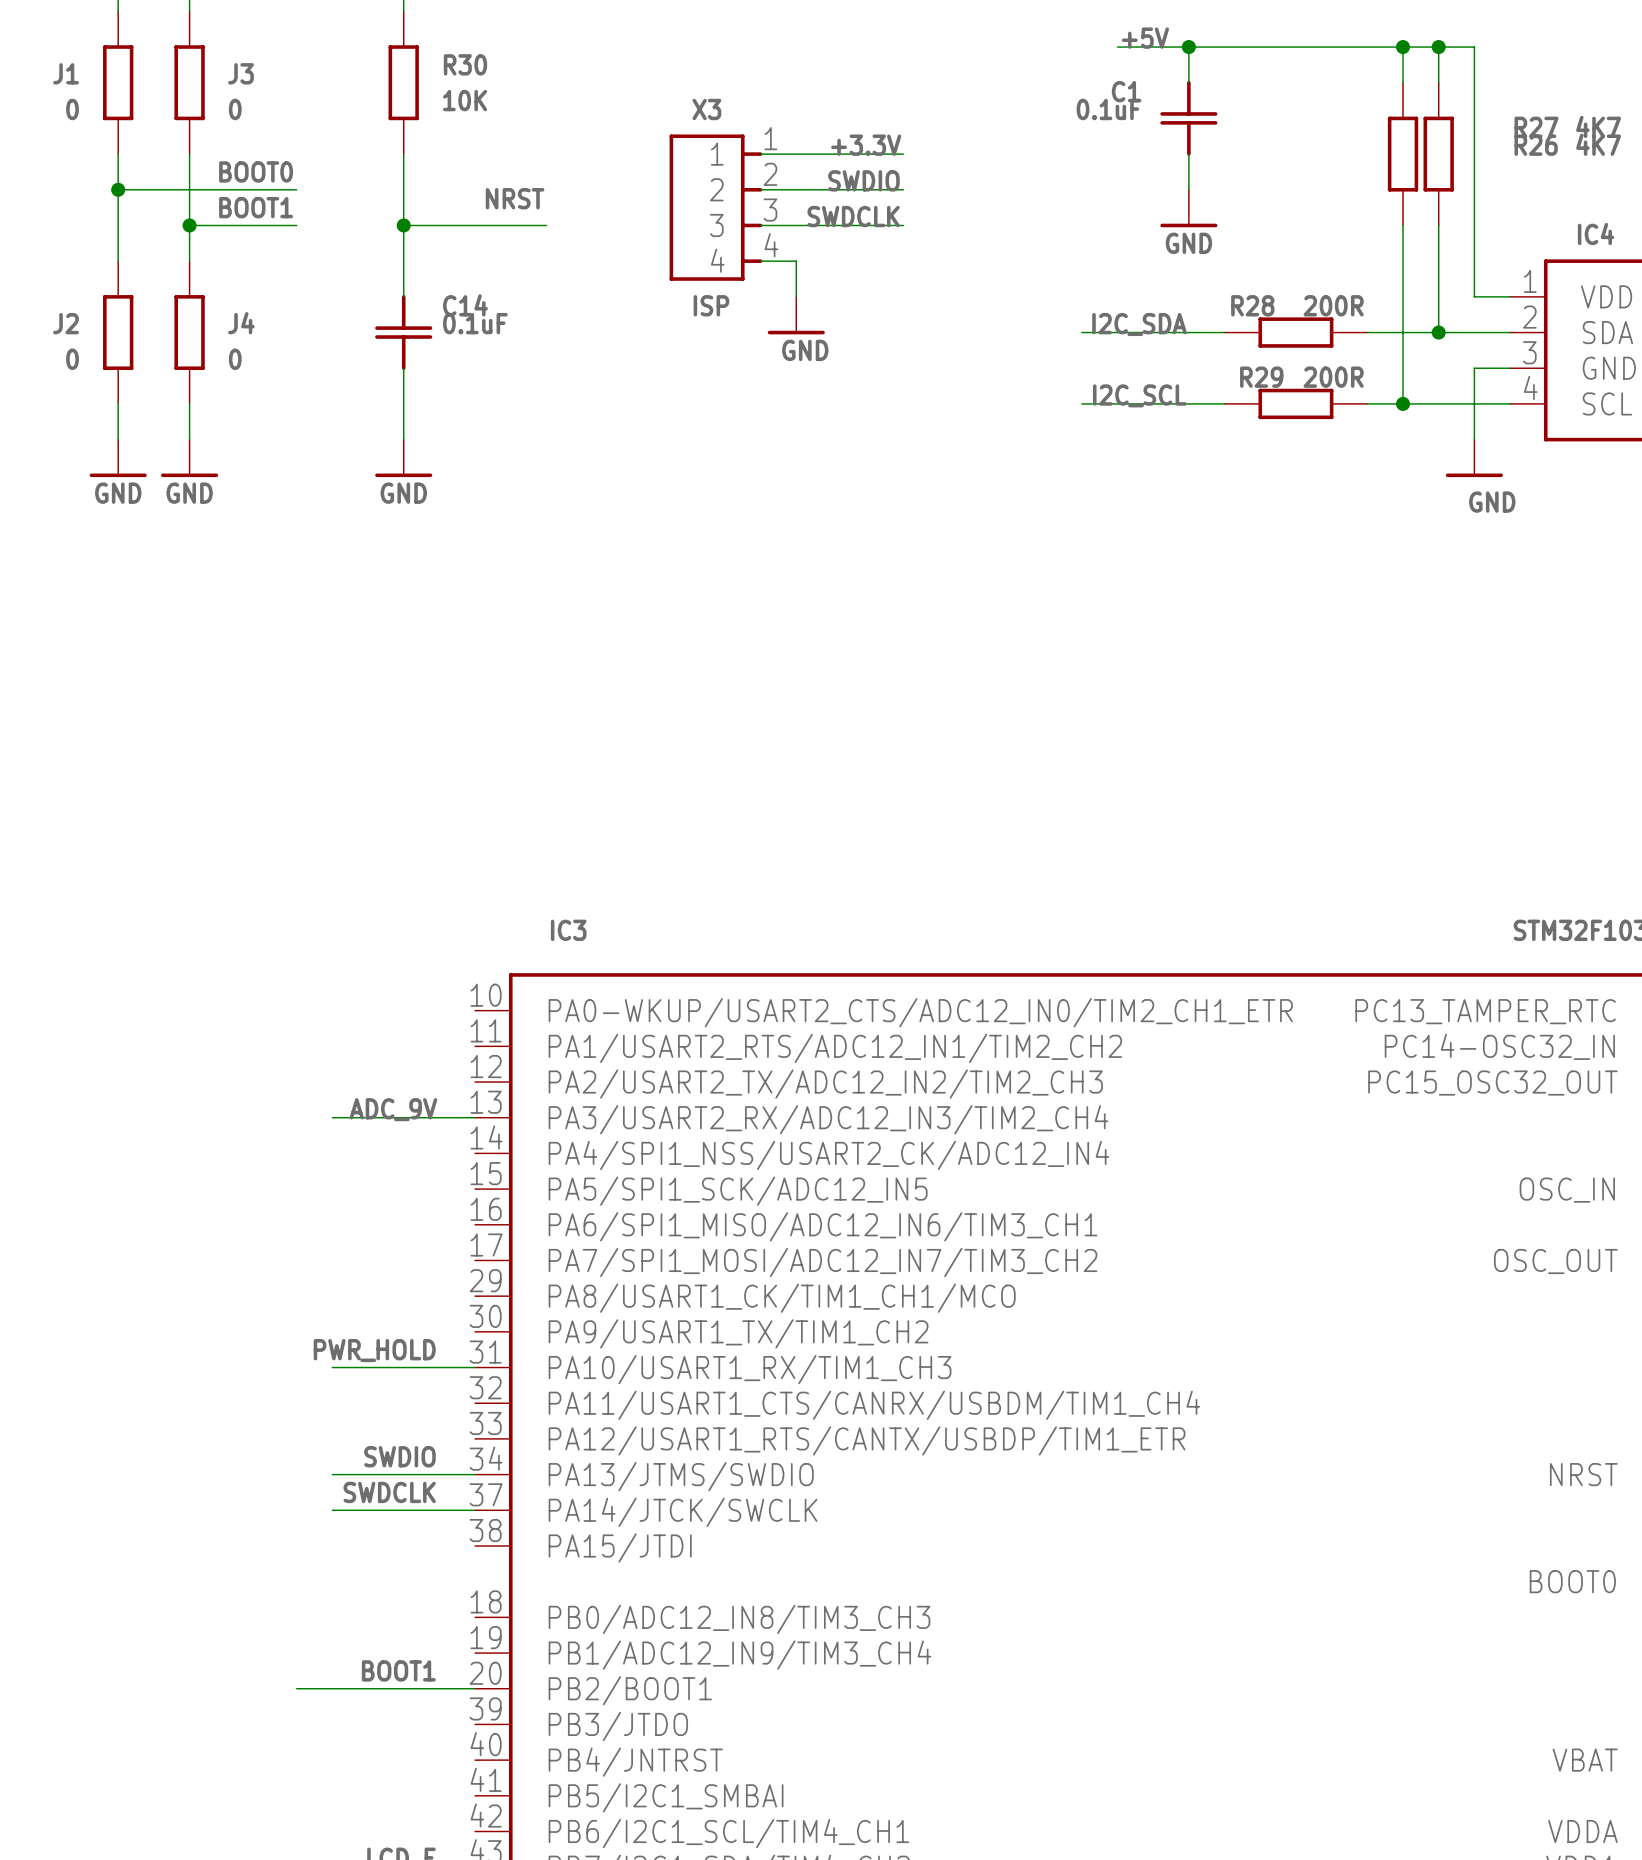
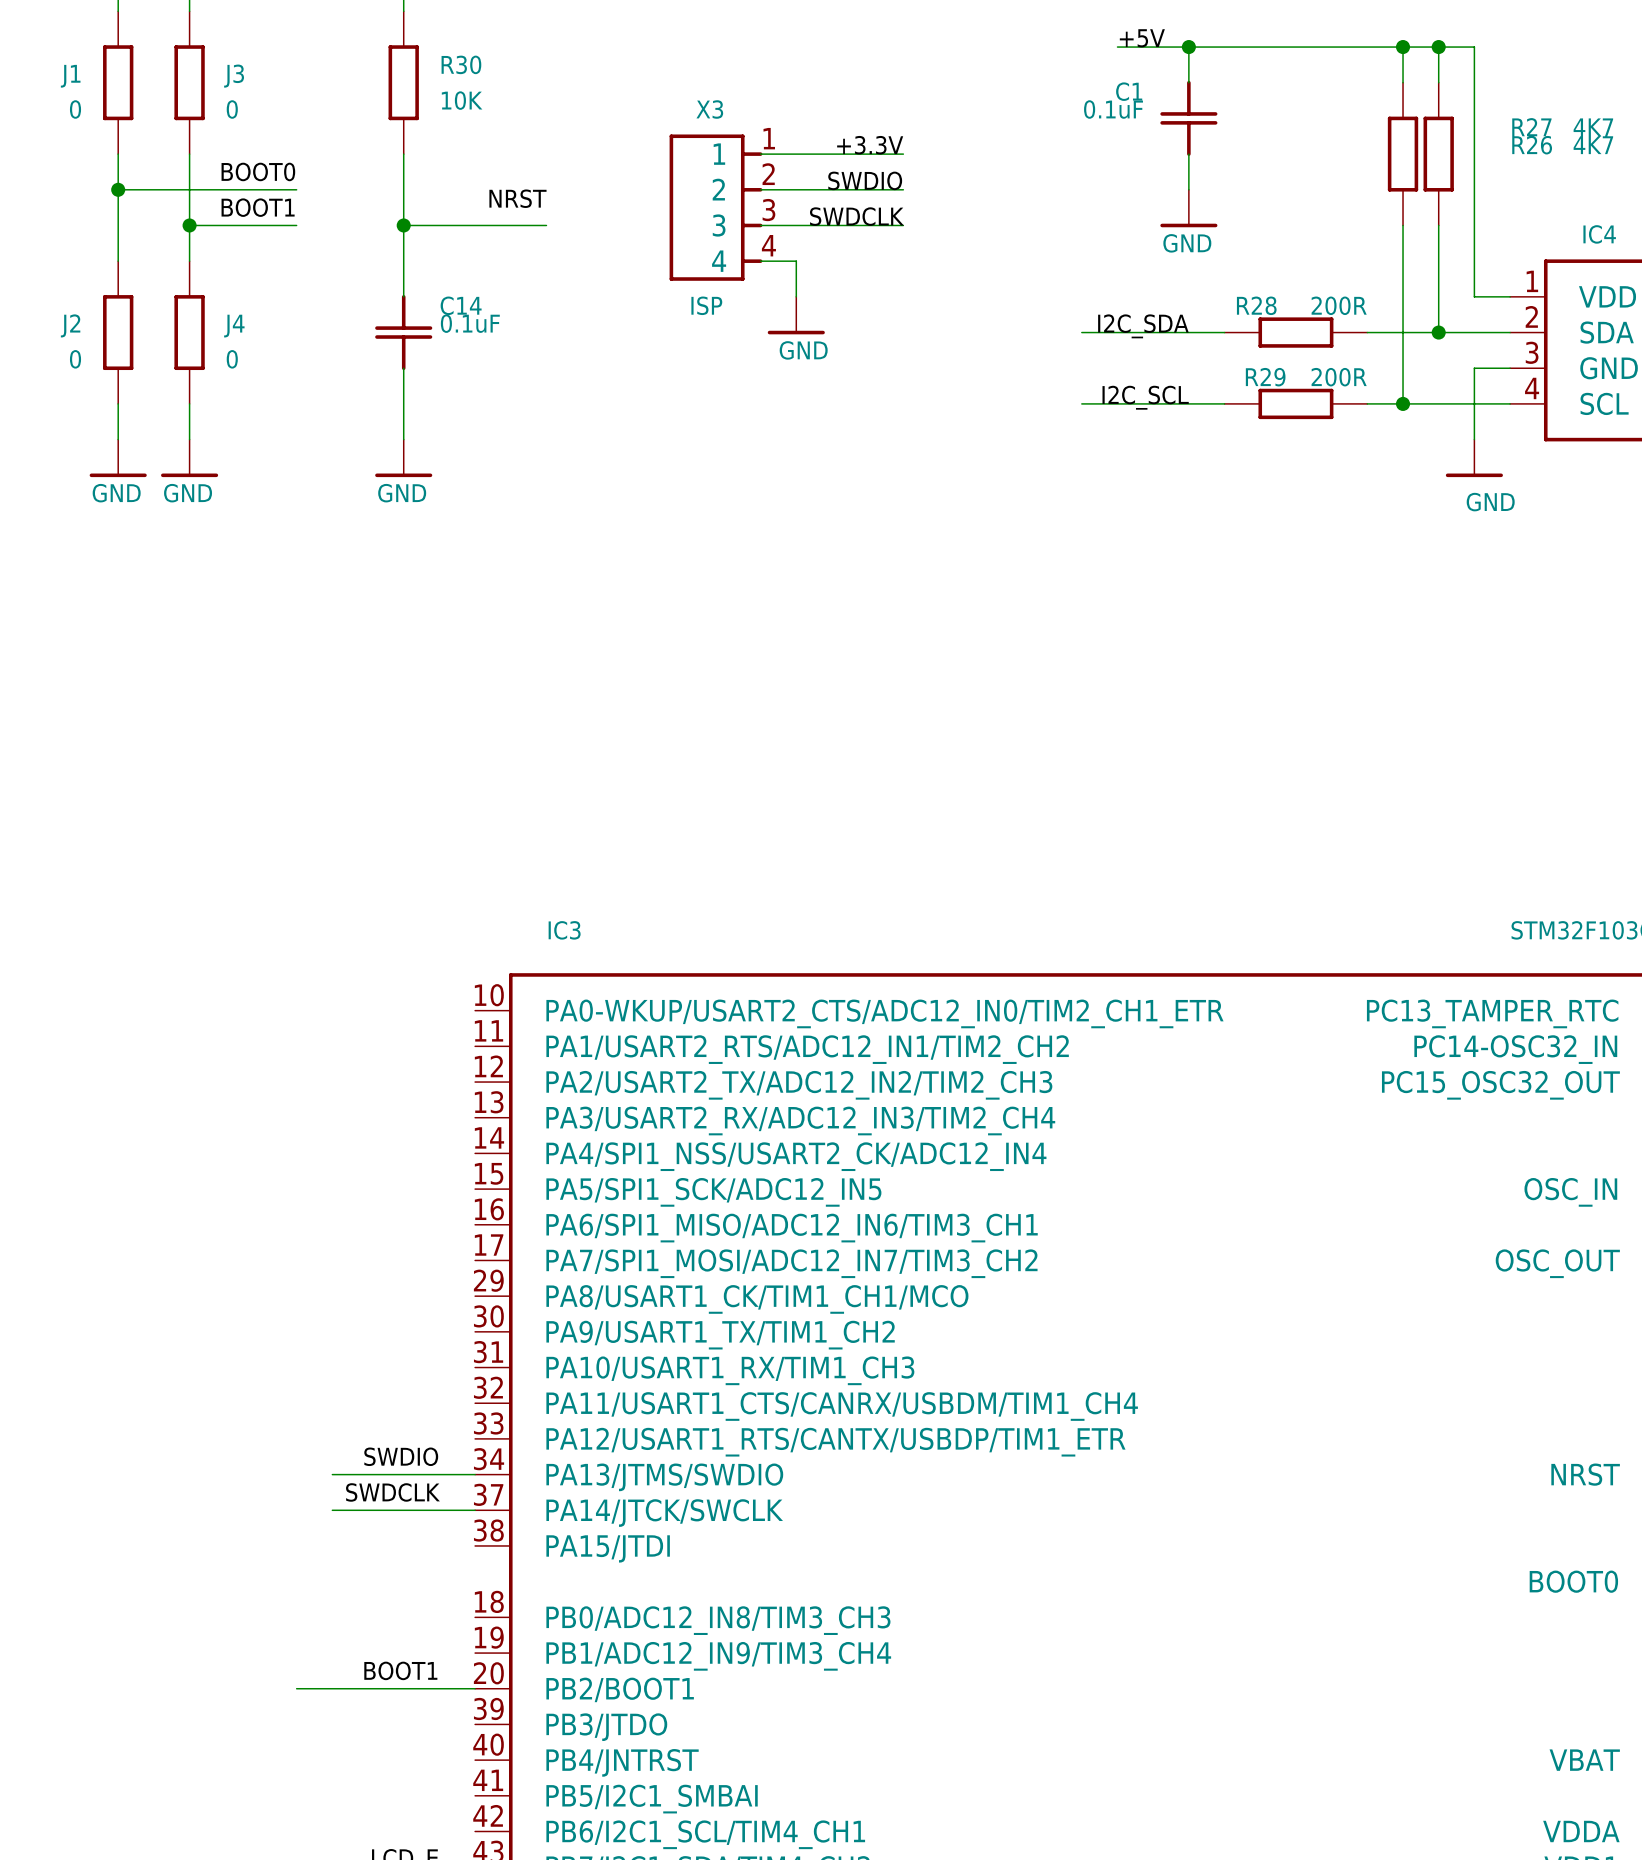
label: ADC_9V (393, 1109) -> none
wire: (332, 1117) (475, 1117) -> none
label: PWR_HOLD (374, 1350) -> none
wire: (332, 1367) (475, 1367) -> none

